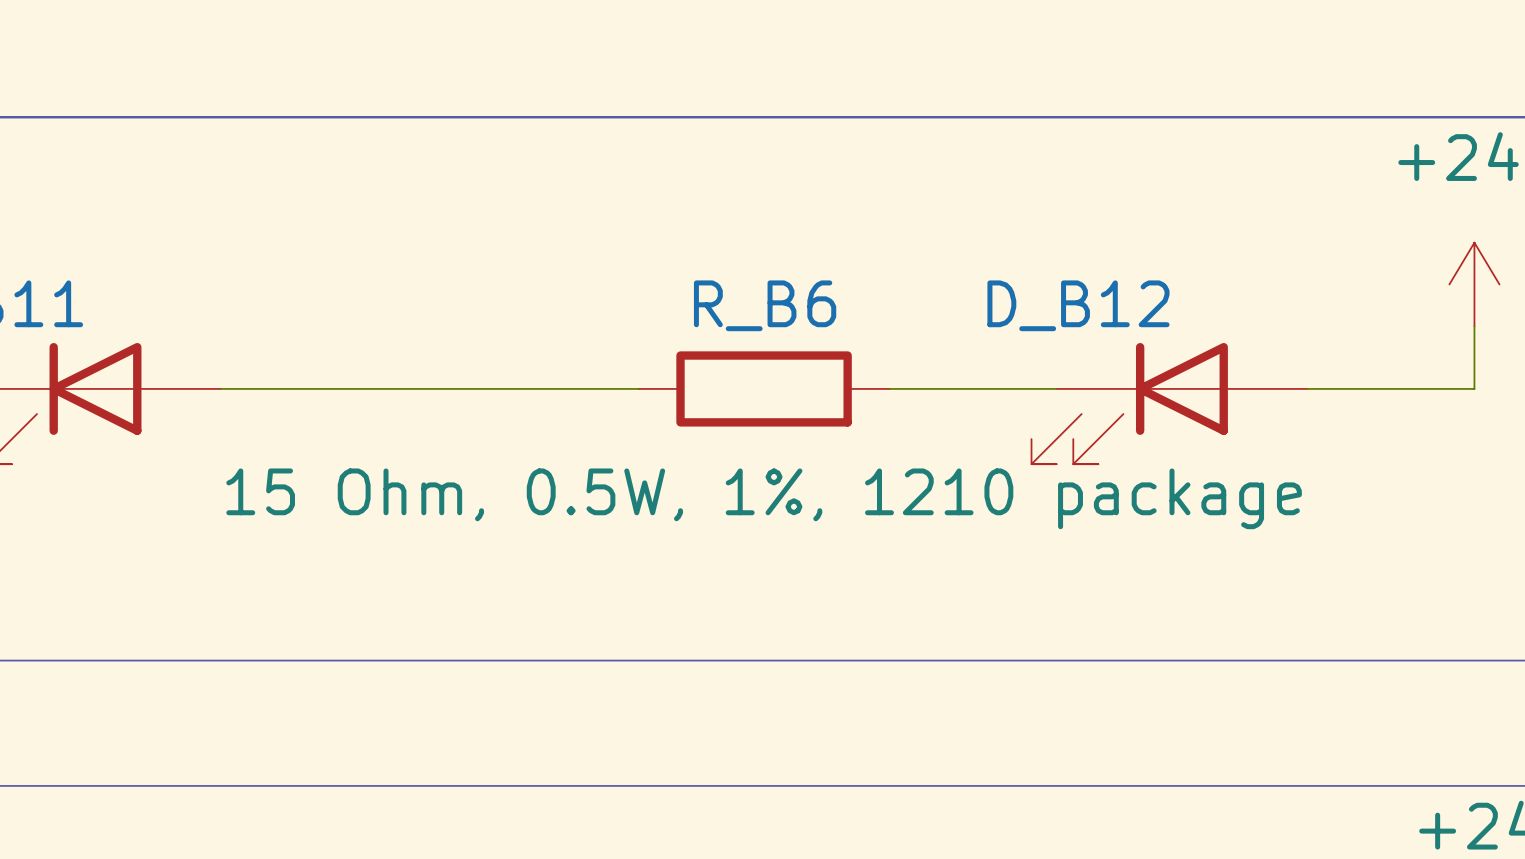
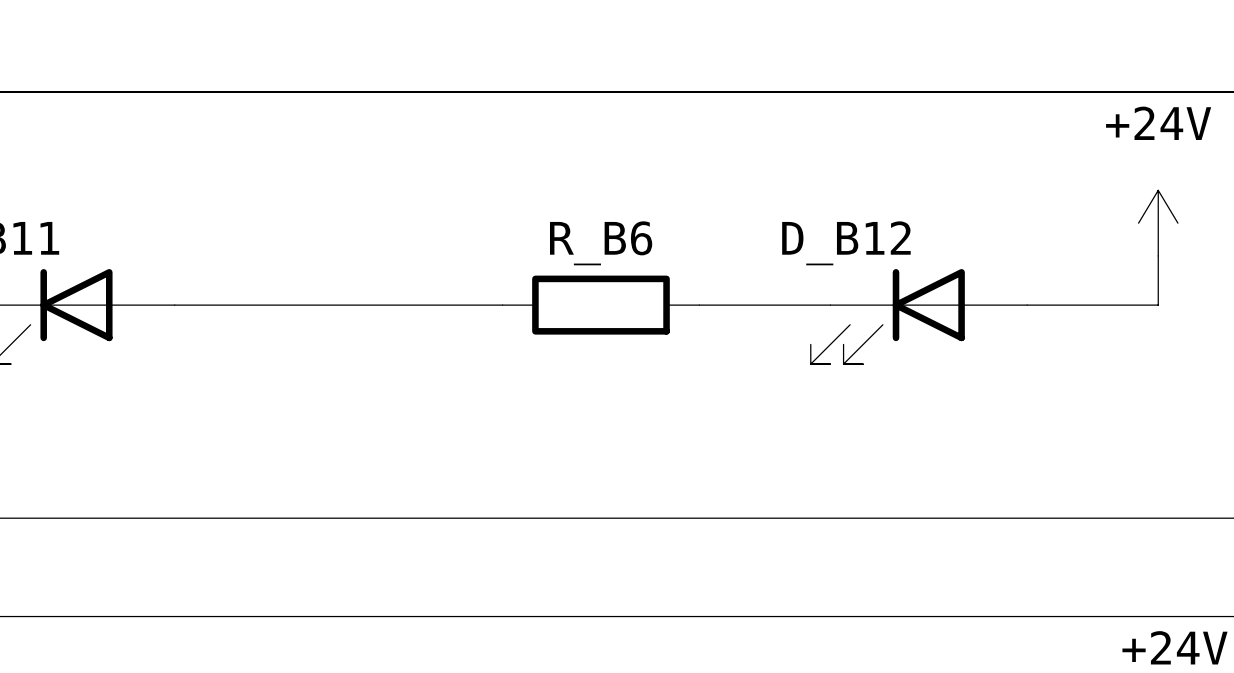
R_B6 value: 15 Ohm, 0.5W, 1%, 1210 package (764, 498) -> none

